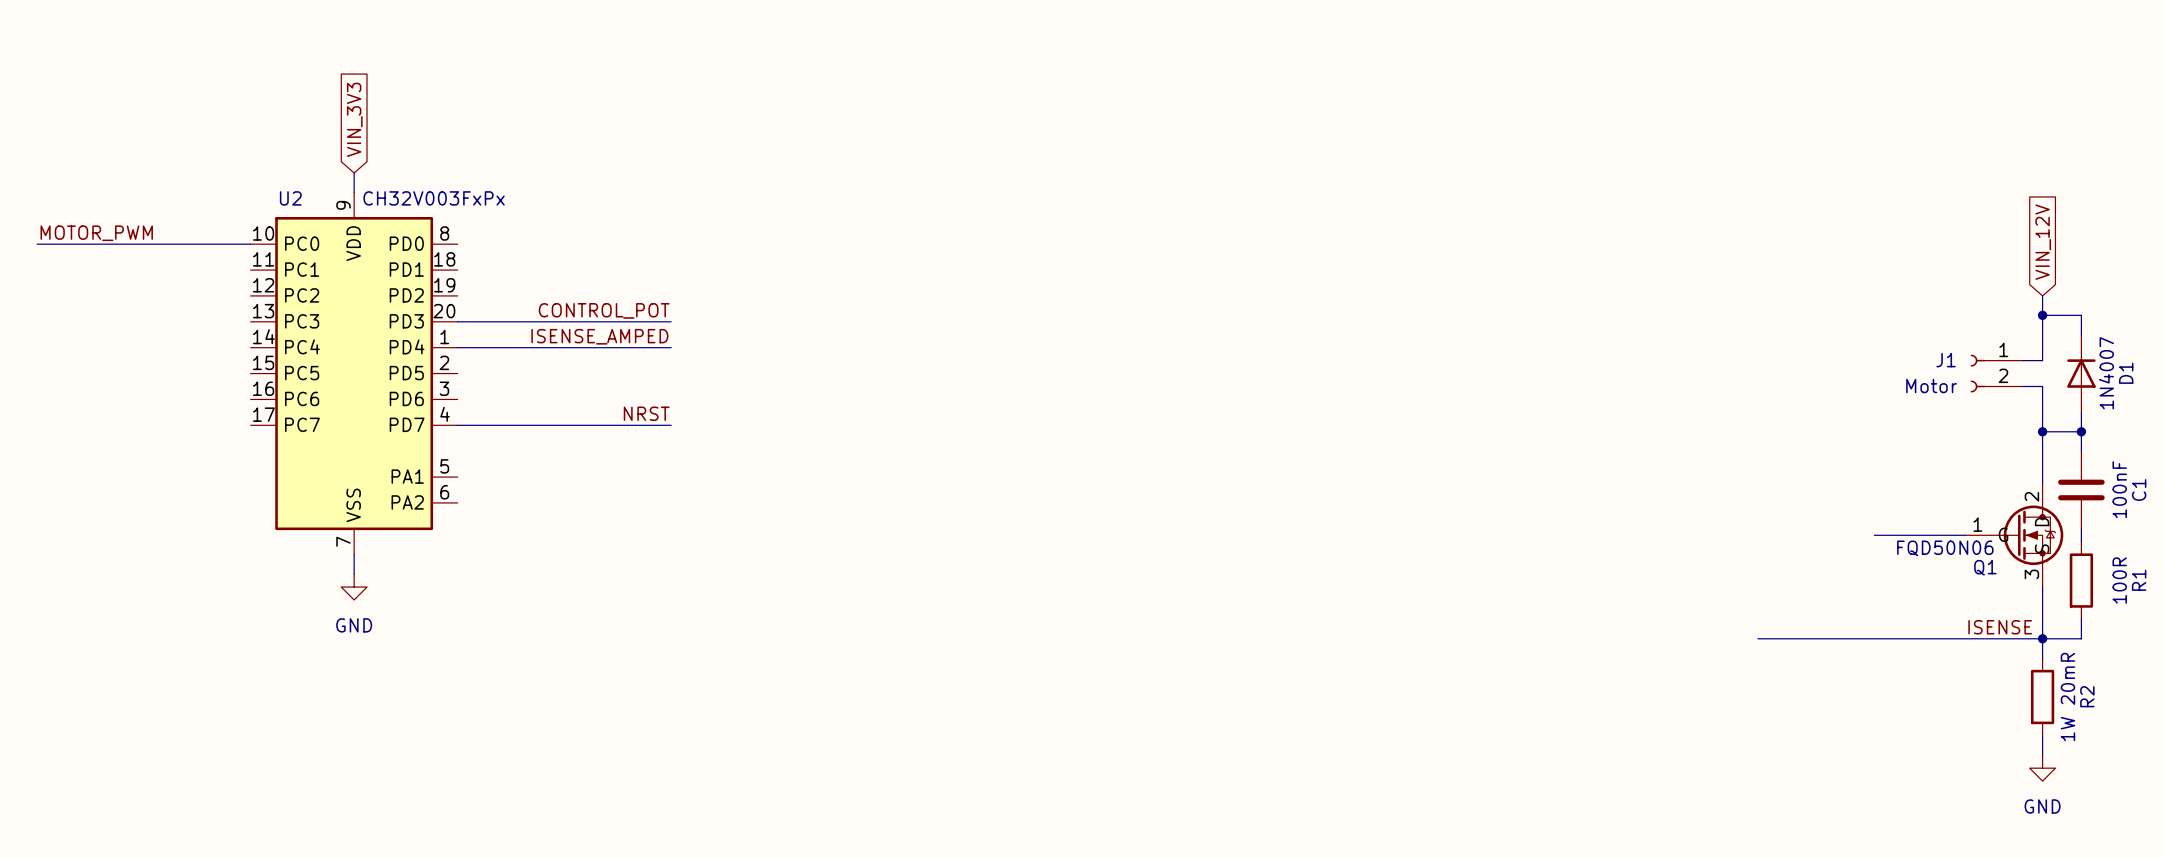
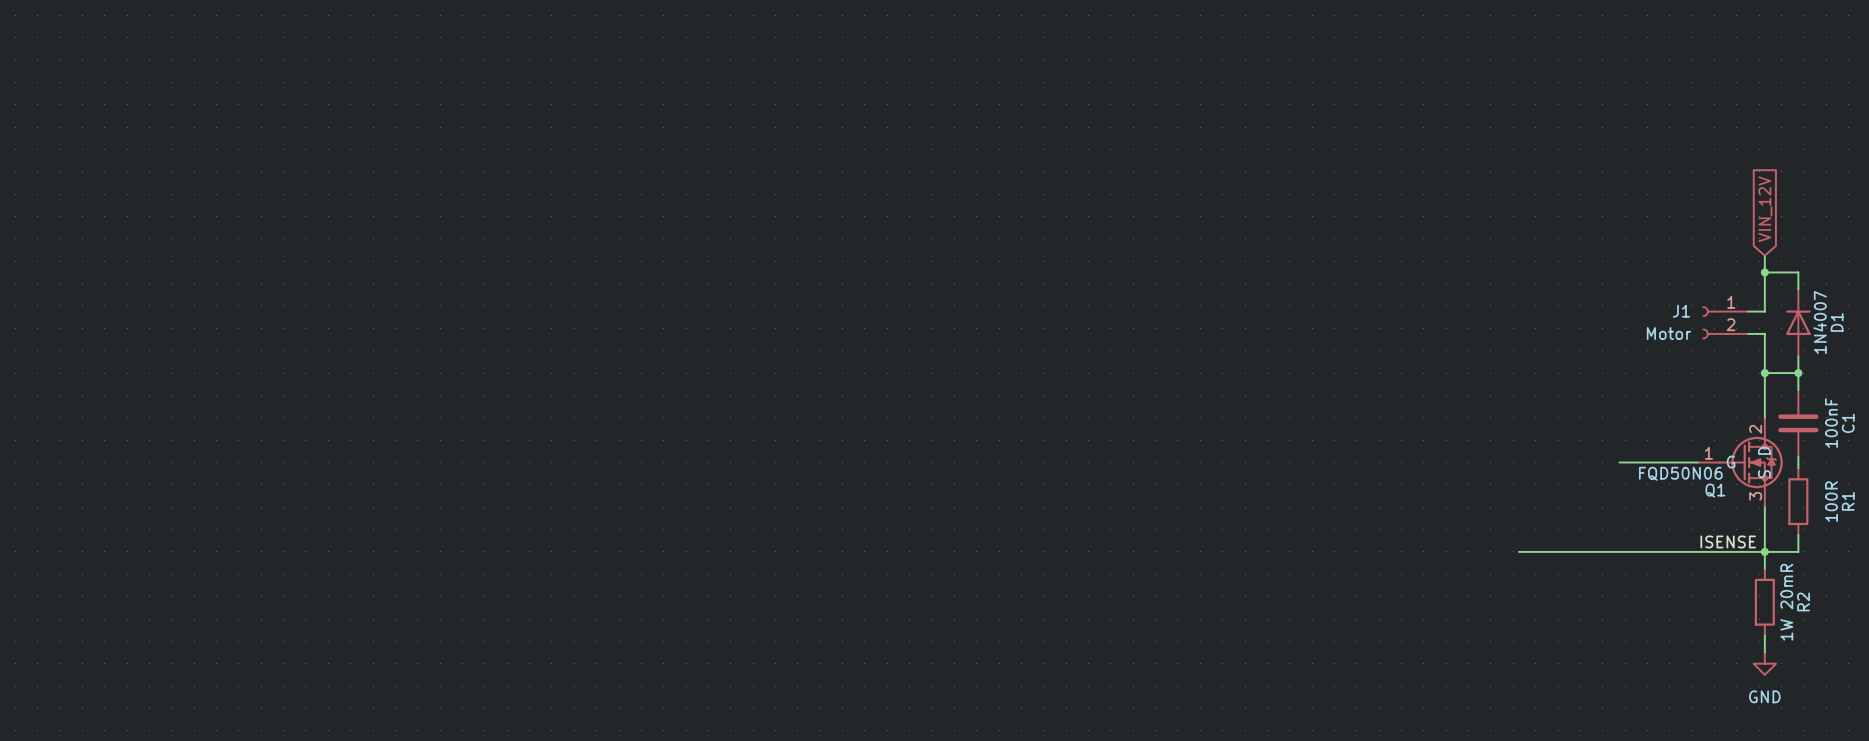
global label: VIN_3V3 (354, 119) -> none
wire: (354, 173) (354, 192) -> none
label: MOTOR_PWM (96, 233) -> none
wire: (37, 244) (250, 244) -> none
label: CONTROL_POT (604, 310) -> none
wire: (457, 321) (671, 321) -> none
label: ISENSE_AMPED (599, 336) -> none
wire: (457, 347) (671, 347) -> none
U2: CH32V003FxPx (354, 373) -> none
label: NRST (646, 413) -> none
wire: (457, 425) (671, 425) -> none
wire: (354, 554) (354, 574) -> none
power symbol: GND (354, 587) -> none

